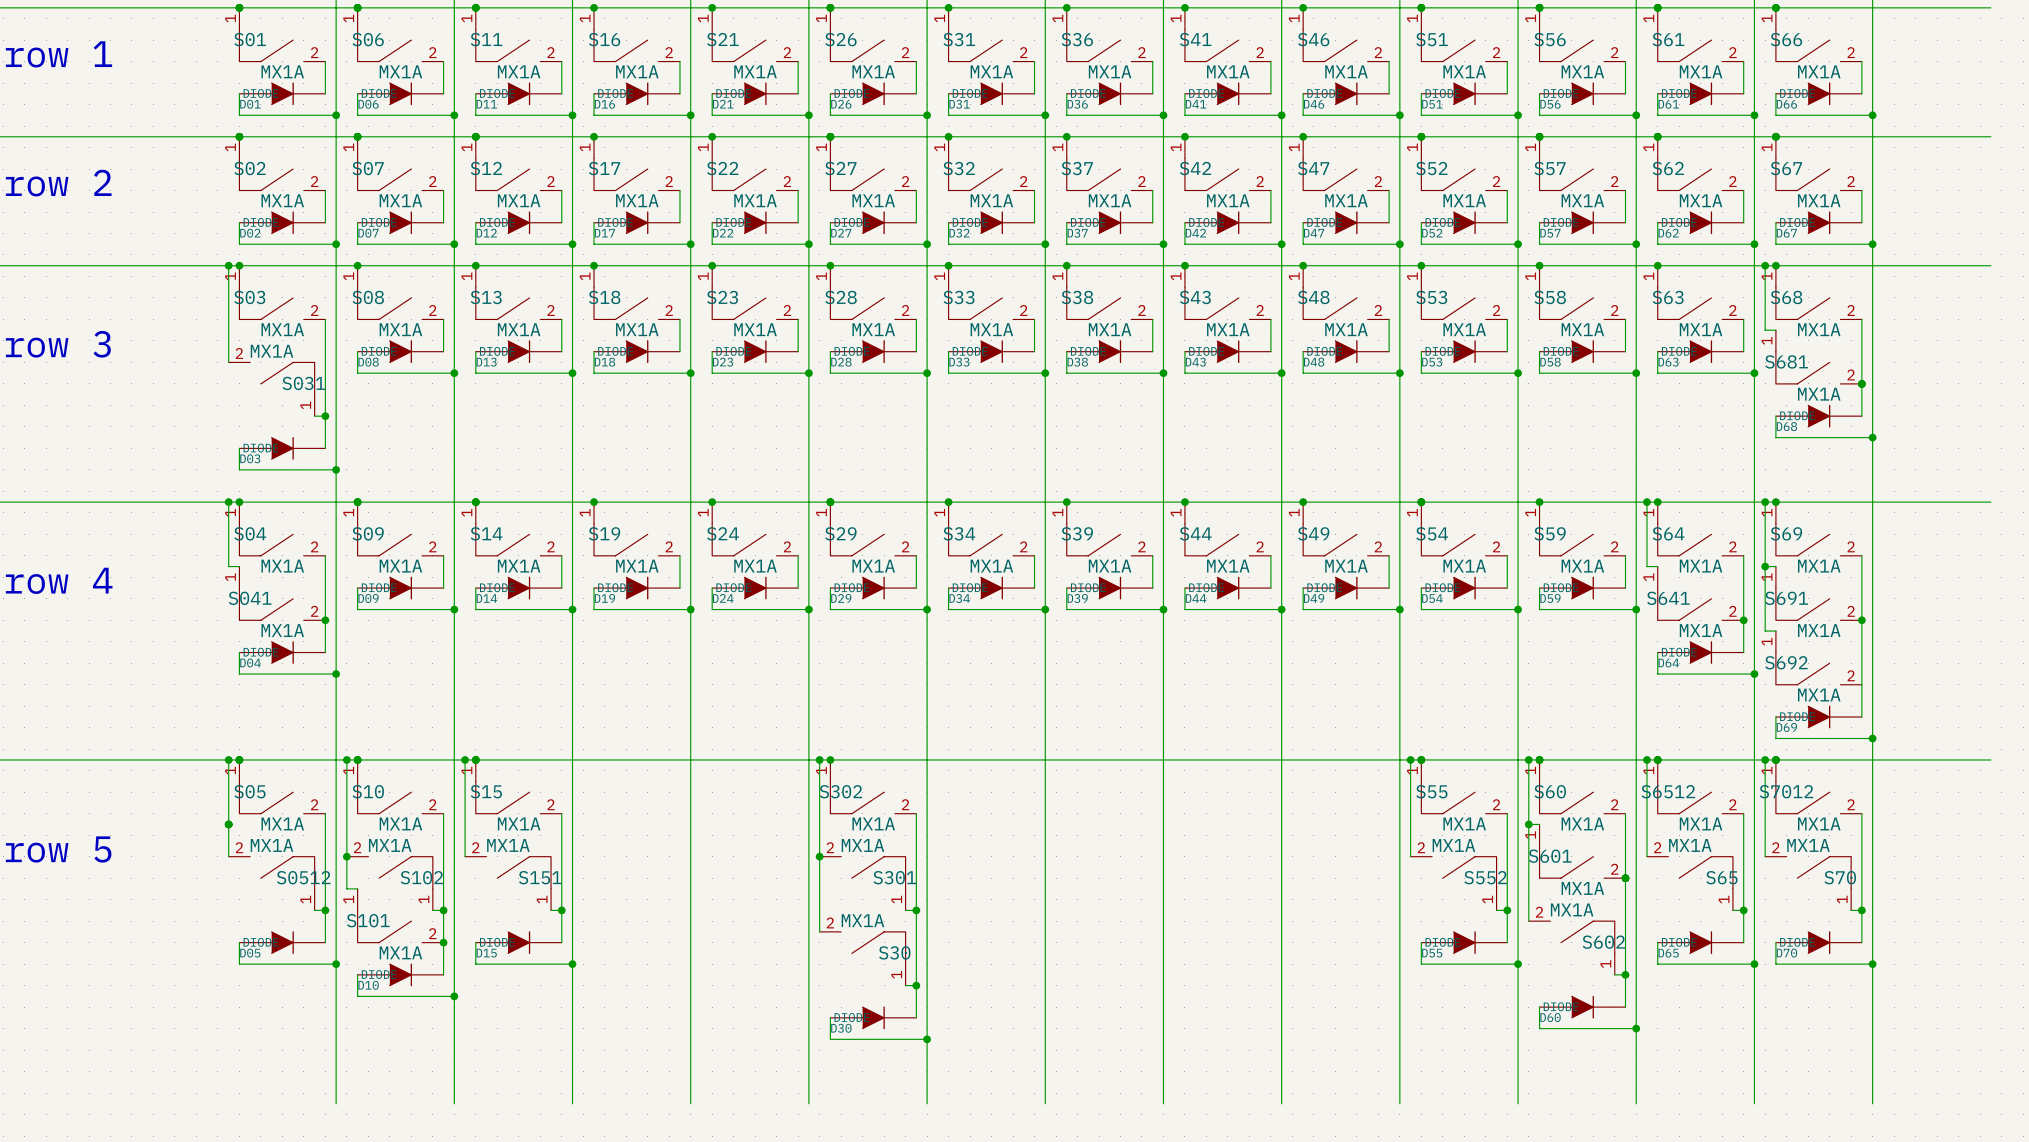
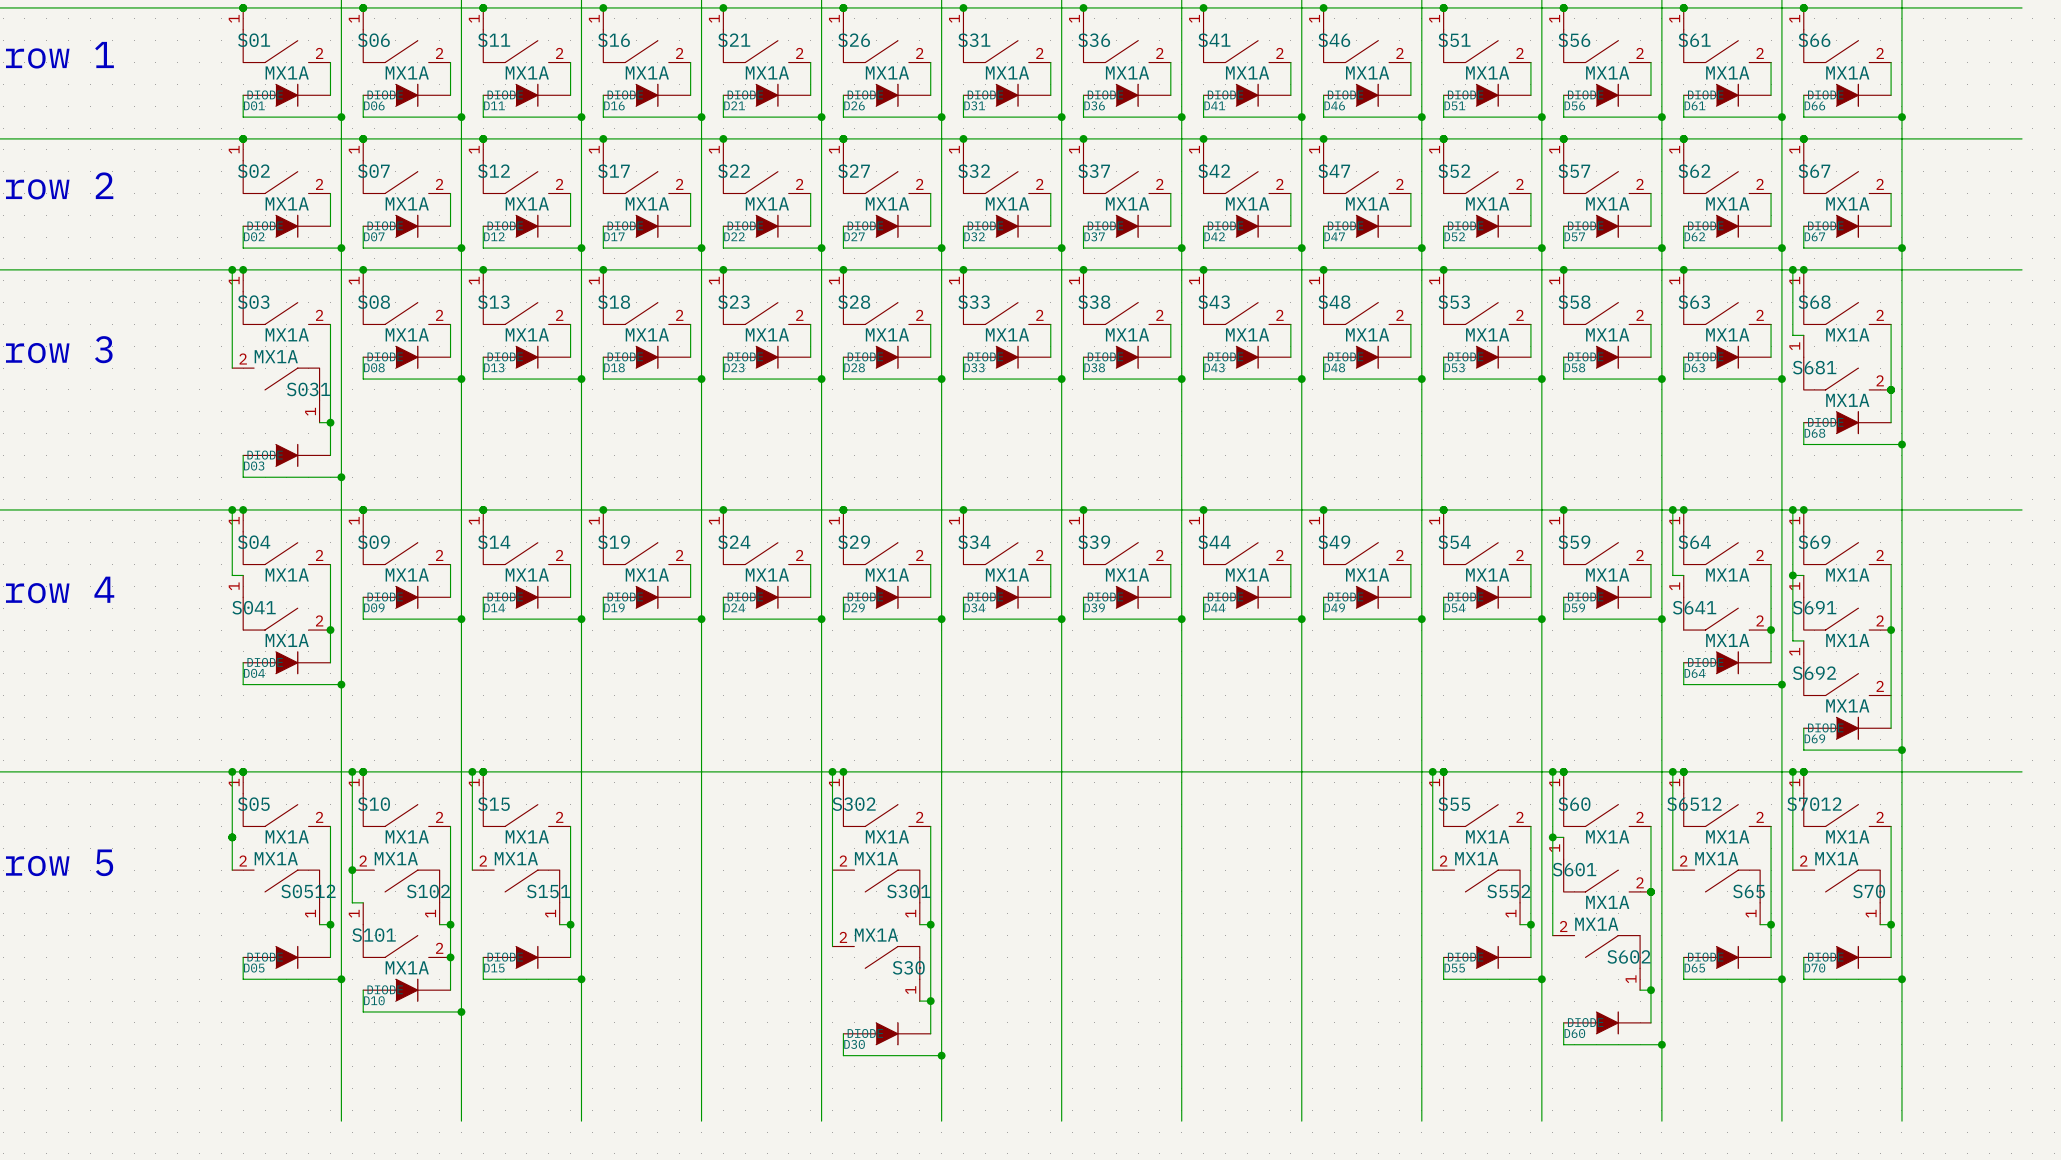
junction: (819, 856) -> none

